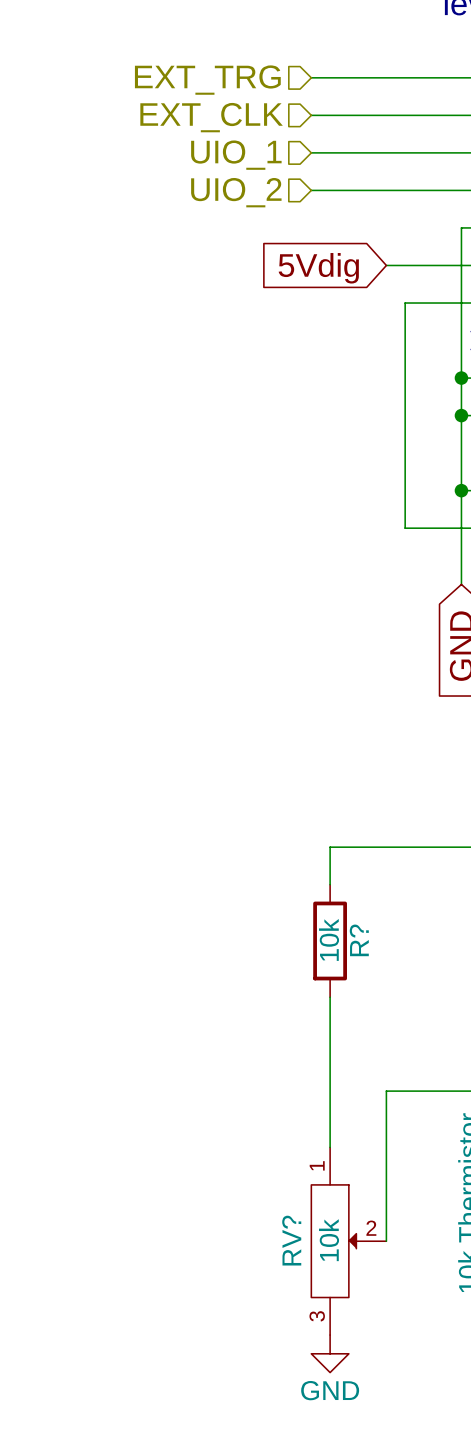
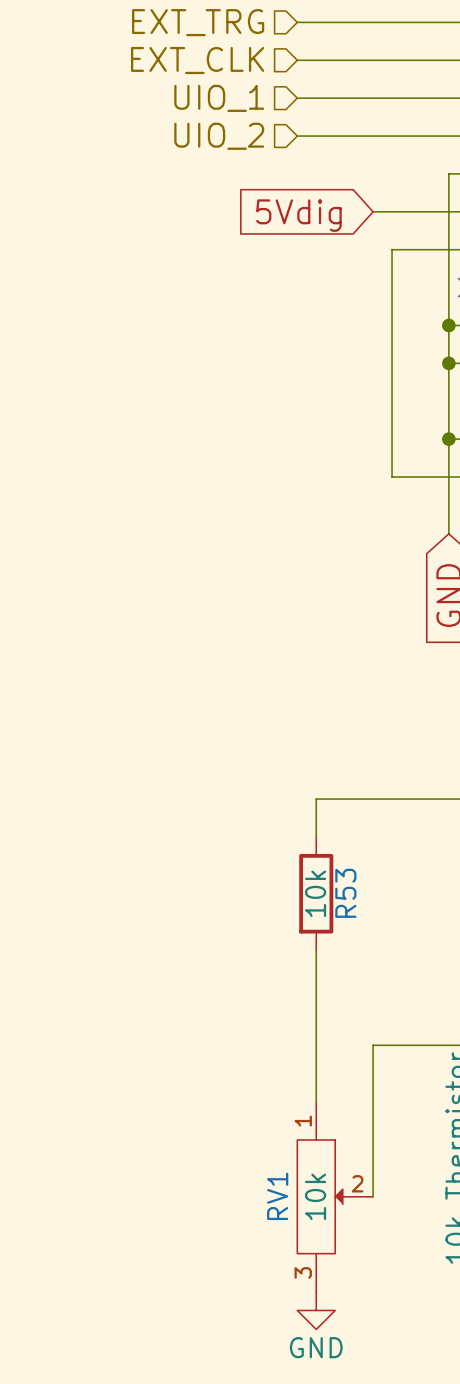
R? name: R? (359, 940) -> R53 (345, 893)
RV? name: RV? (291, 1240) -> RV1 (277, 1196)

